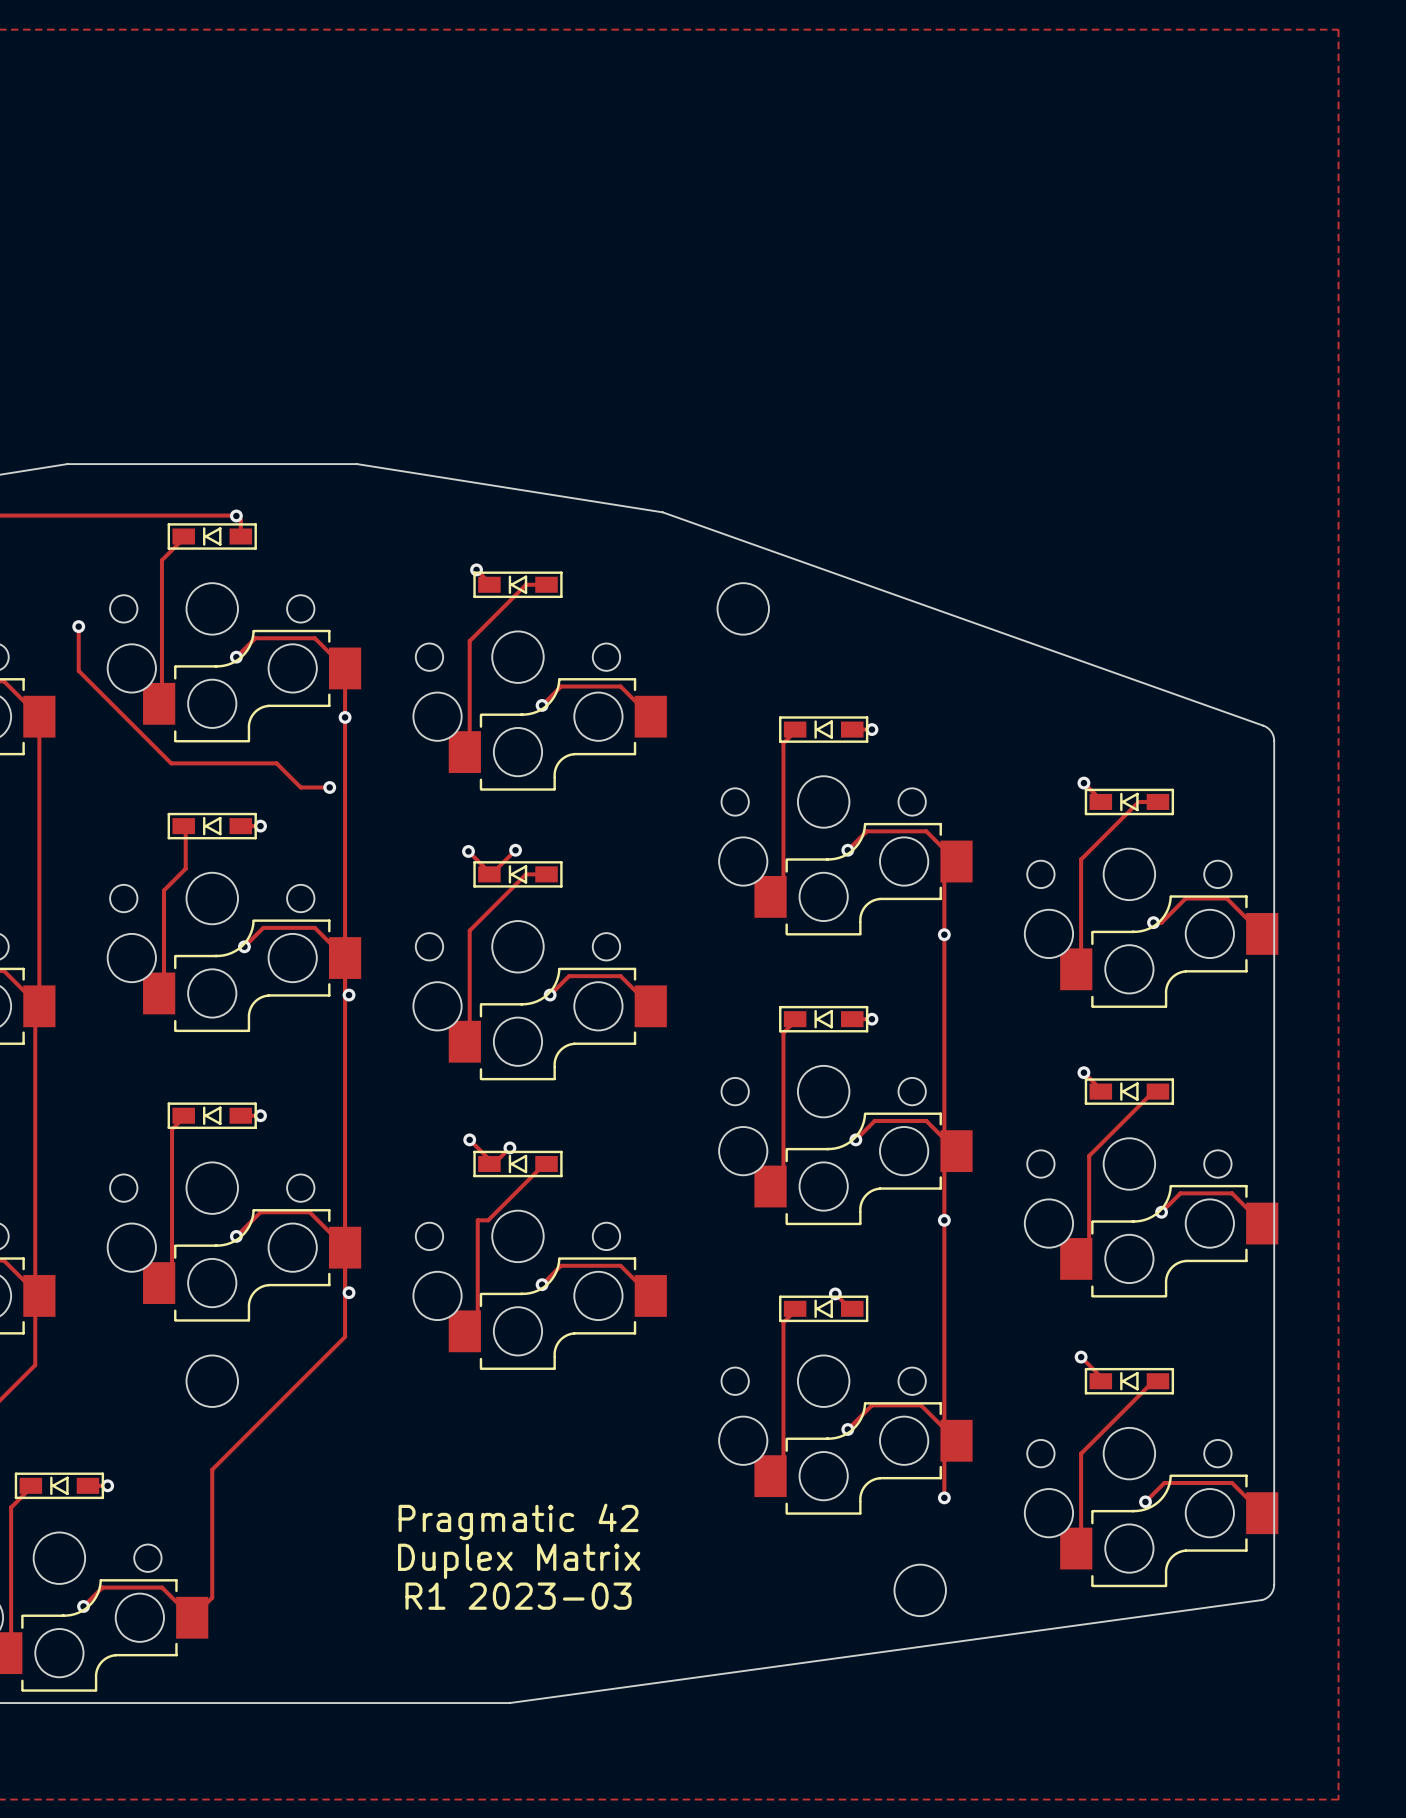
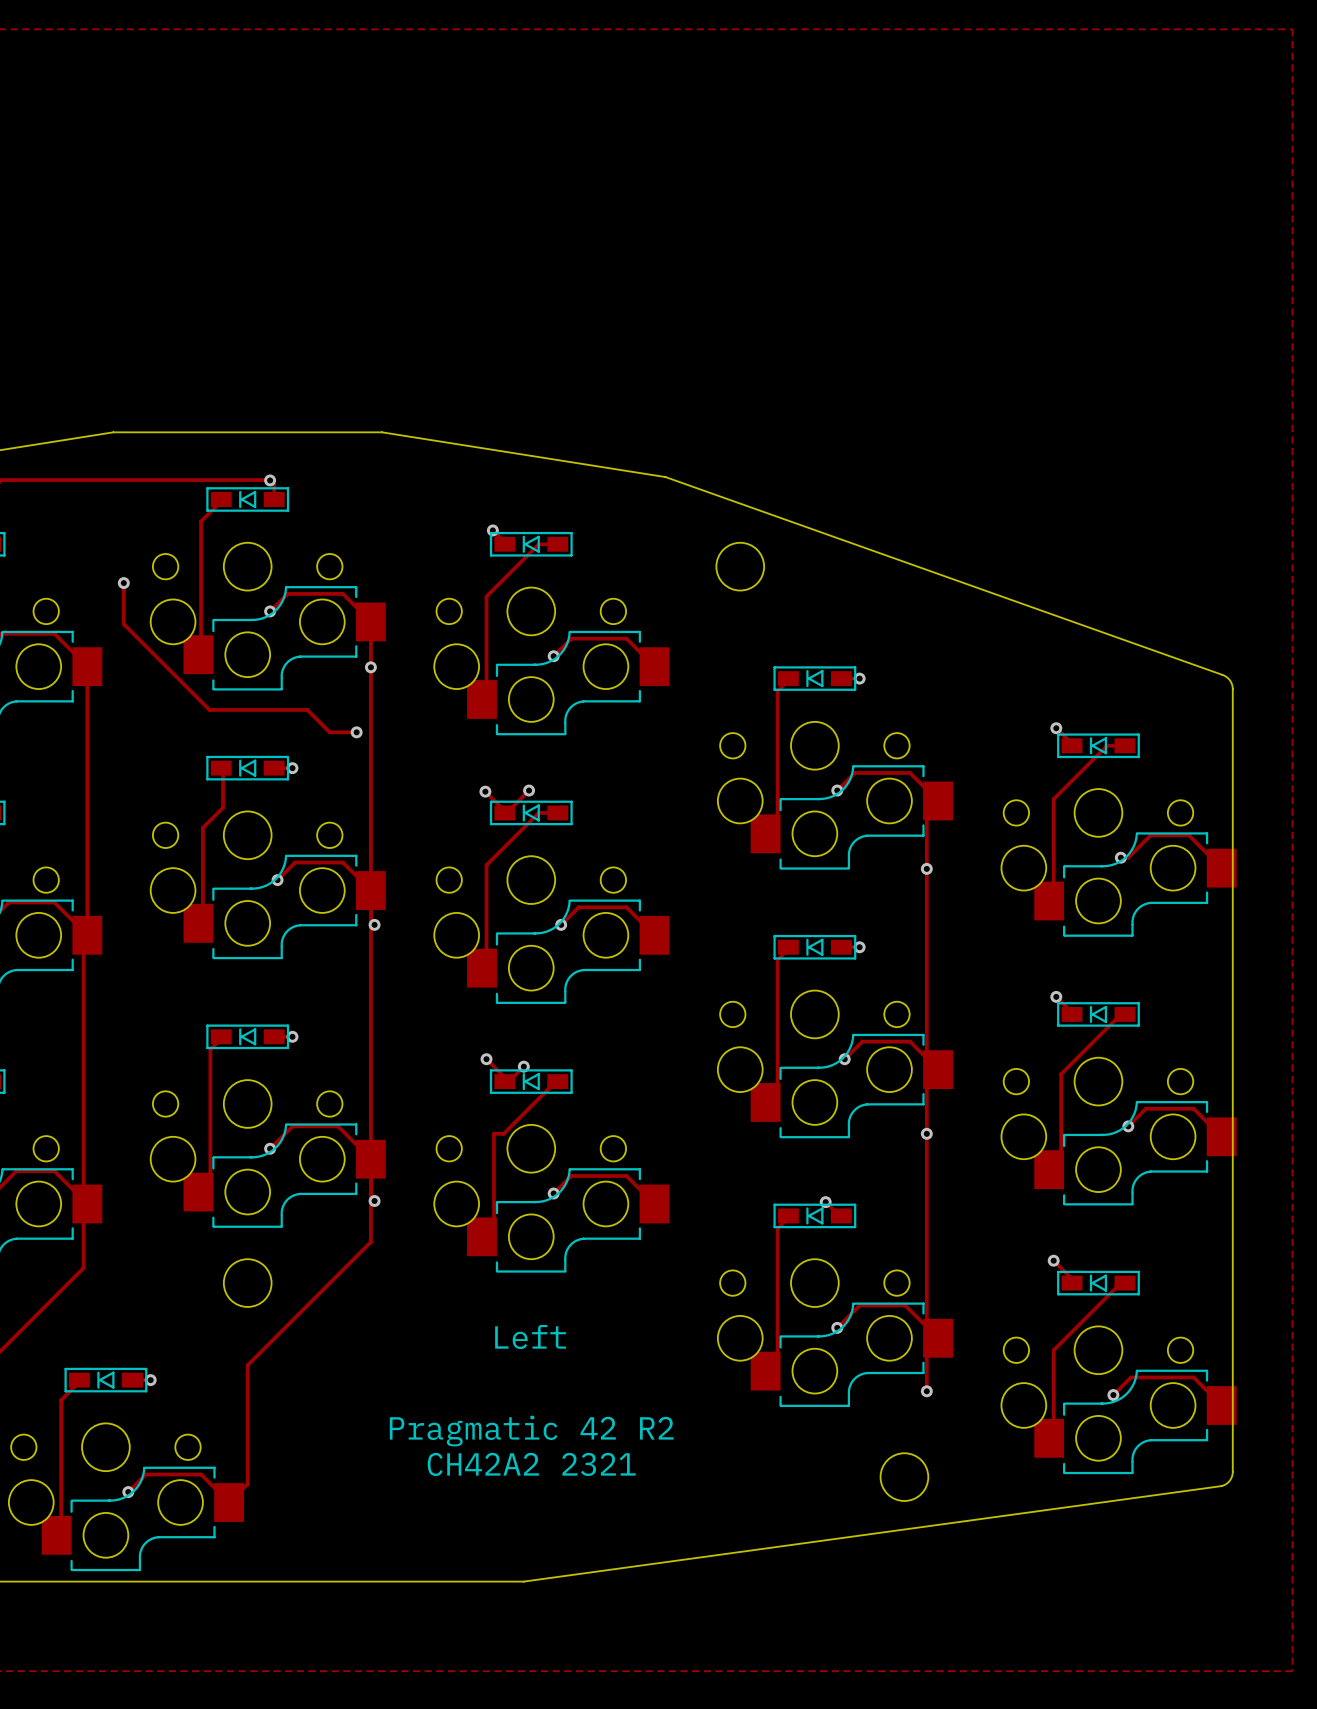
text: none -> Left (530, 1336)
text: Pragmatic 42 (518, 1521) -> Pragmatic 42 R2 (531, 1431)
text: Duplex Matrix (519, 1561) -> none
text: none -> CH42A2 2321 (531, 1464)
text: R1 2023-03 (518, 1596) -> none

